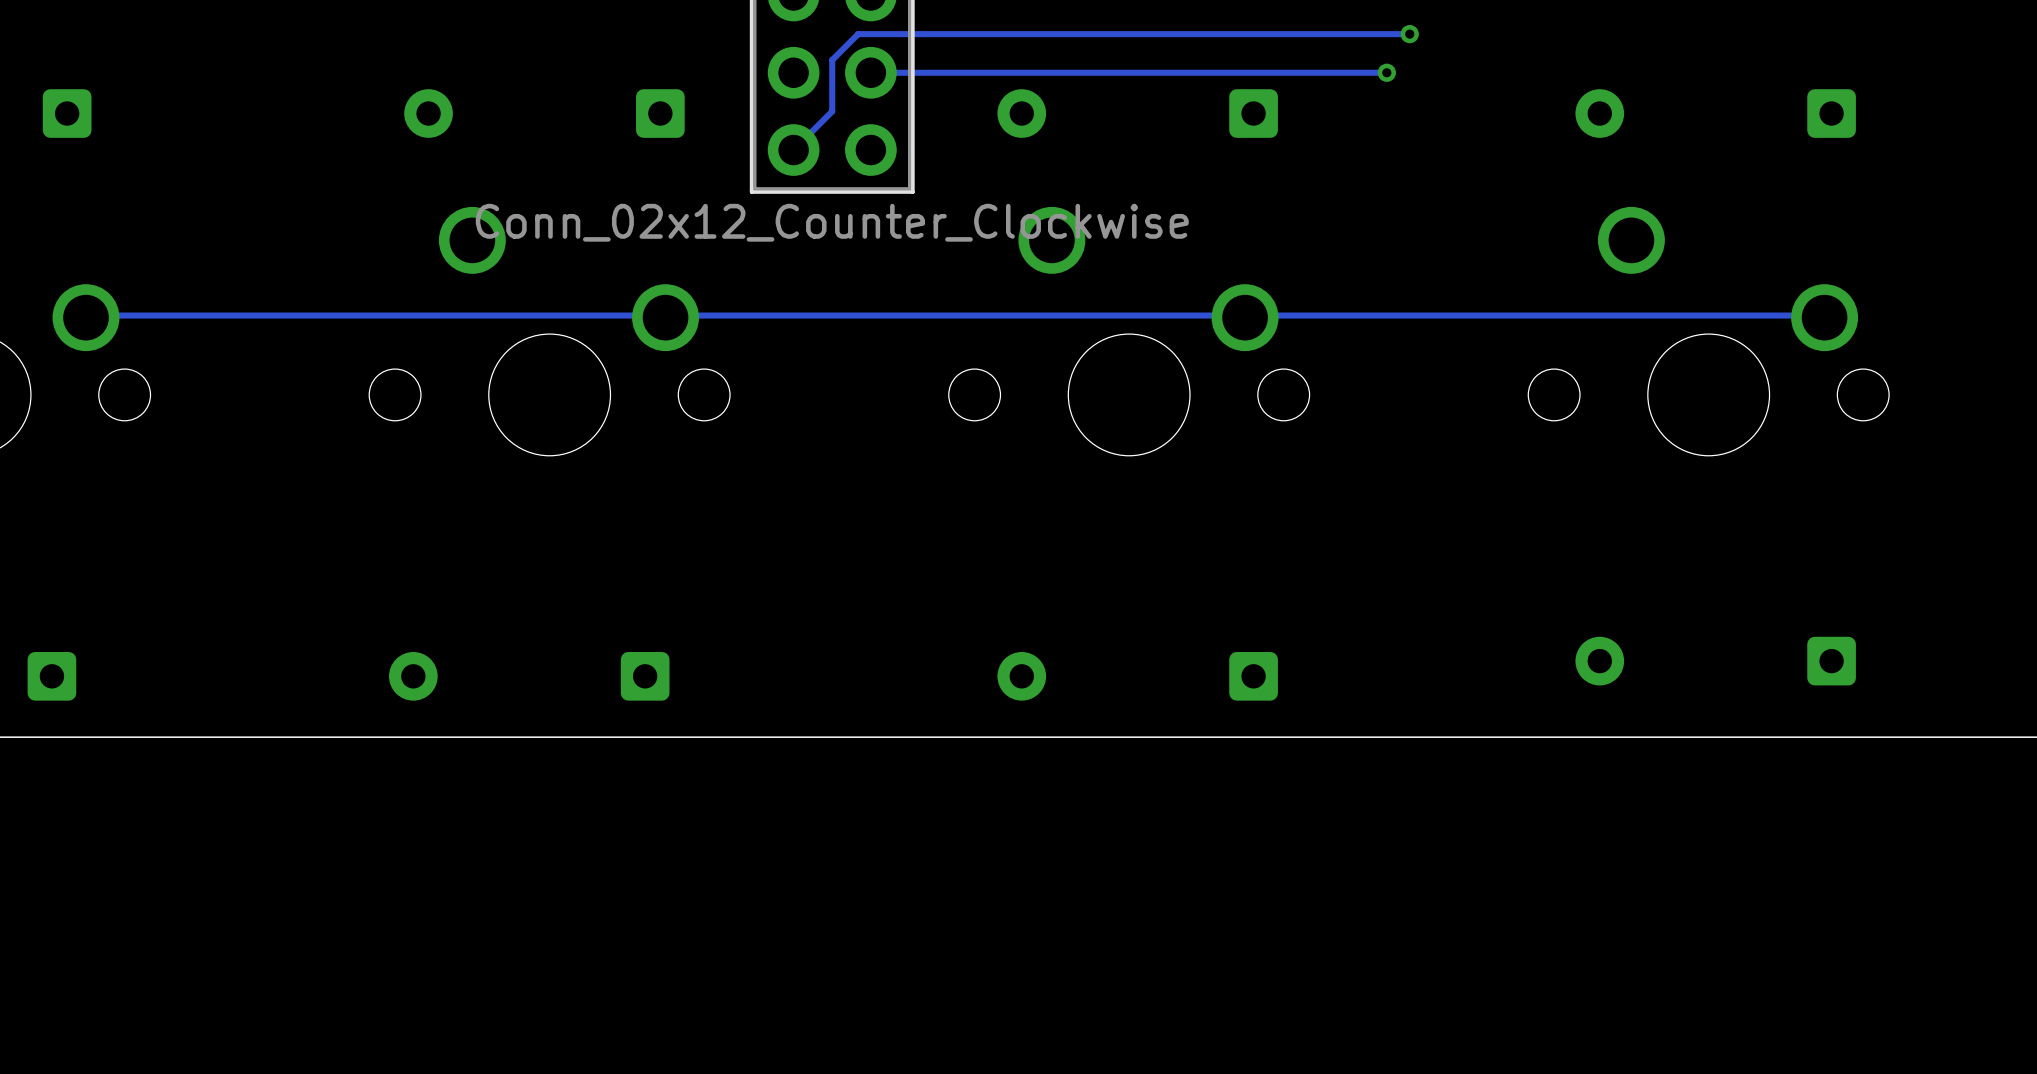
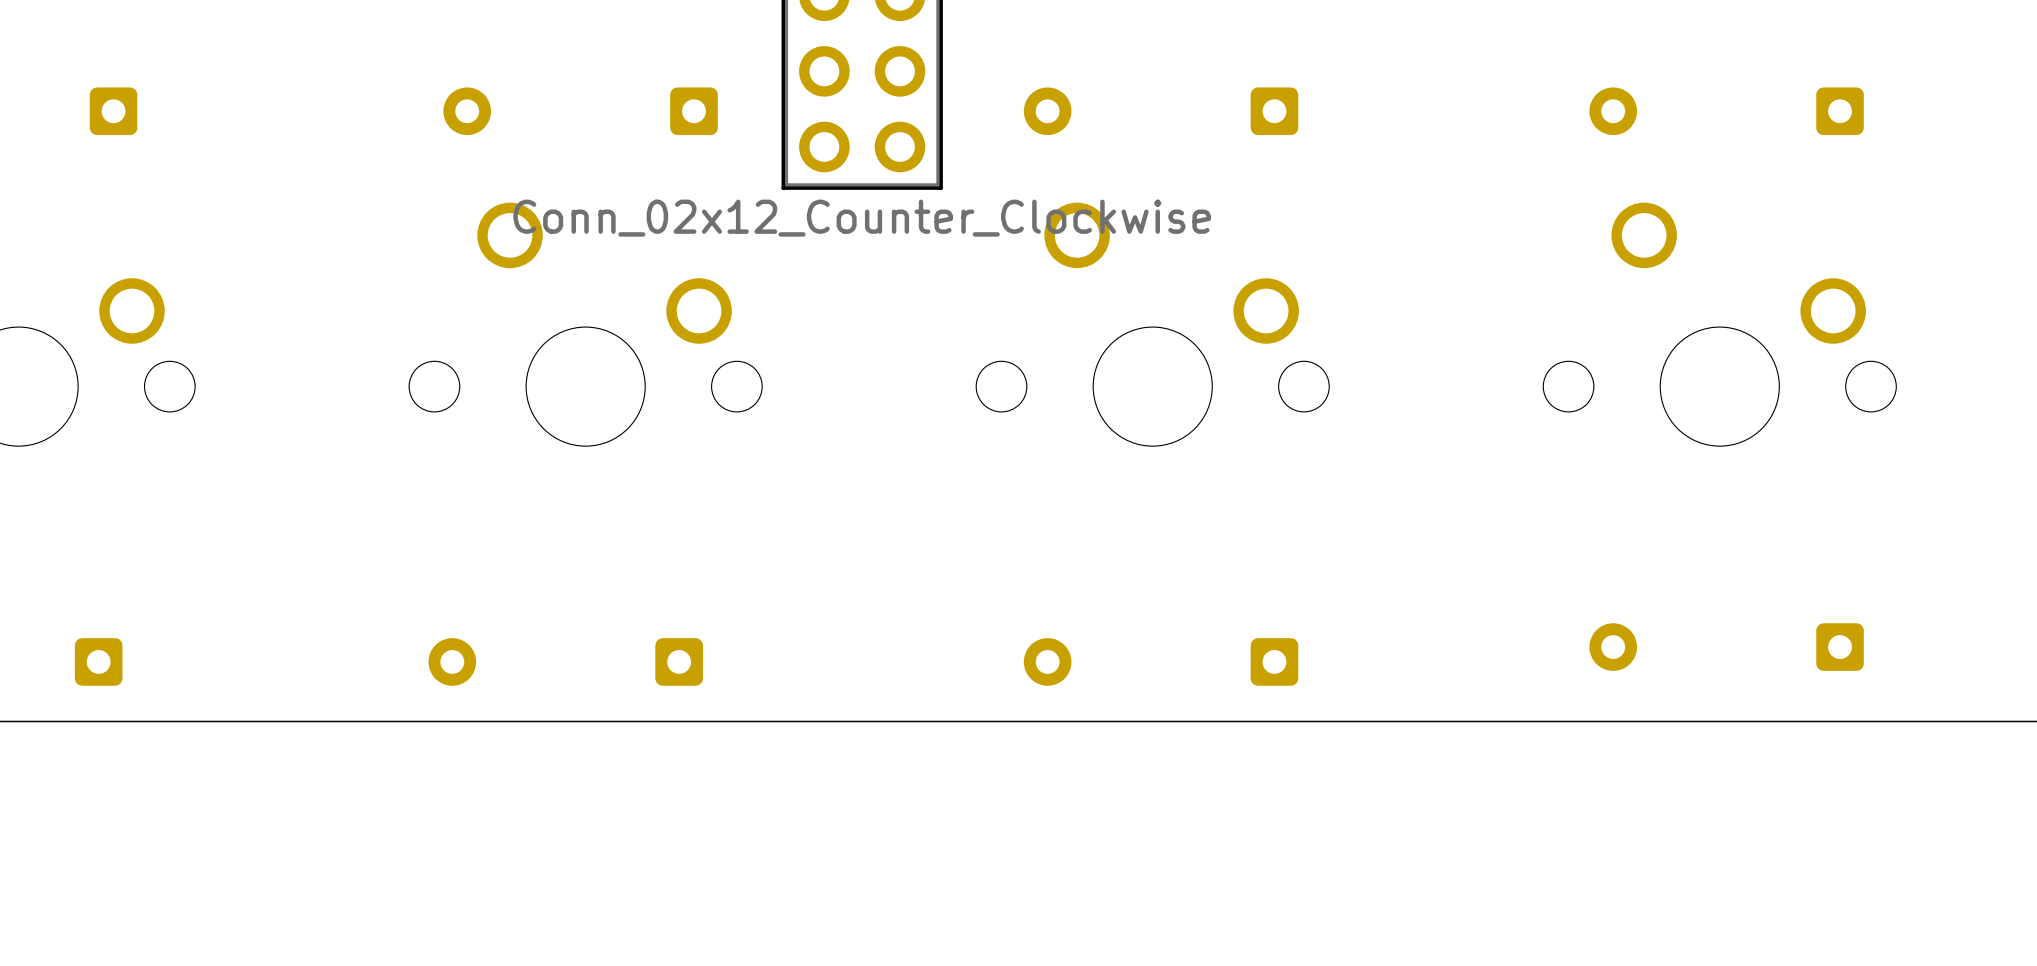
track: (1409, 34) (858, 34) (832, 60) (832, 111) (793, 150) -> none
via: (1409, 34) -> none
track: (1386, 72) (870, 72) -> none
via: (1386, 72) -> none
track: (1824, 317) (1822, 315) (1247, 315) (1245, 317) (1242, 315) (667, 315) (665, 317) (663, 315) (88, 315) (86, 317) -> none

